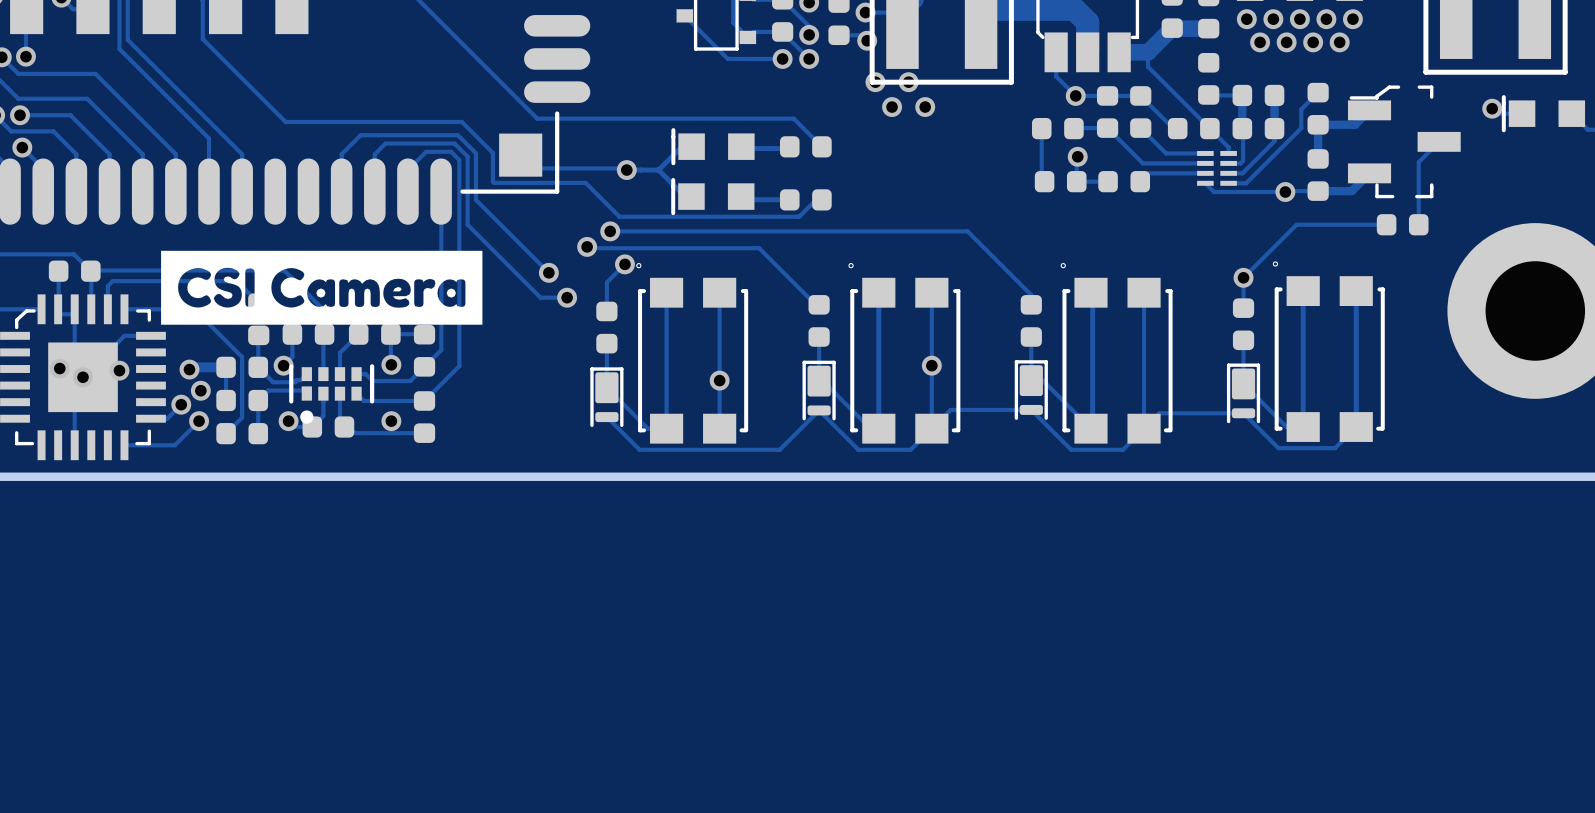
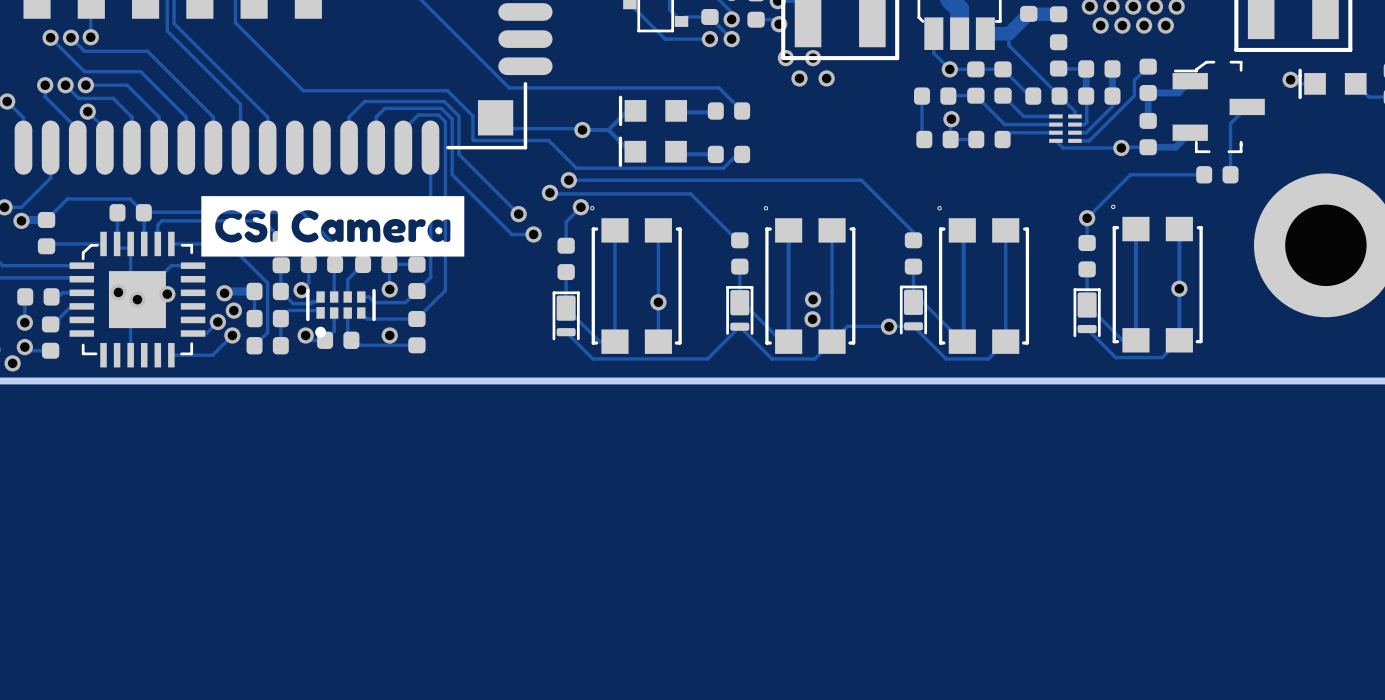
via: none -> (1179, 288)
via: (931, 365) -> none
via: none -> (813, 299)
via: none -> (812, 319)
via: none -> (889, 326)
track: (1243, 413) (1159, 413) (1144, 428) -> none

